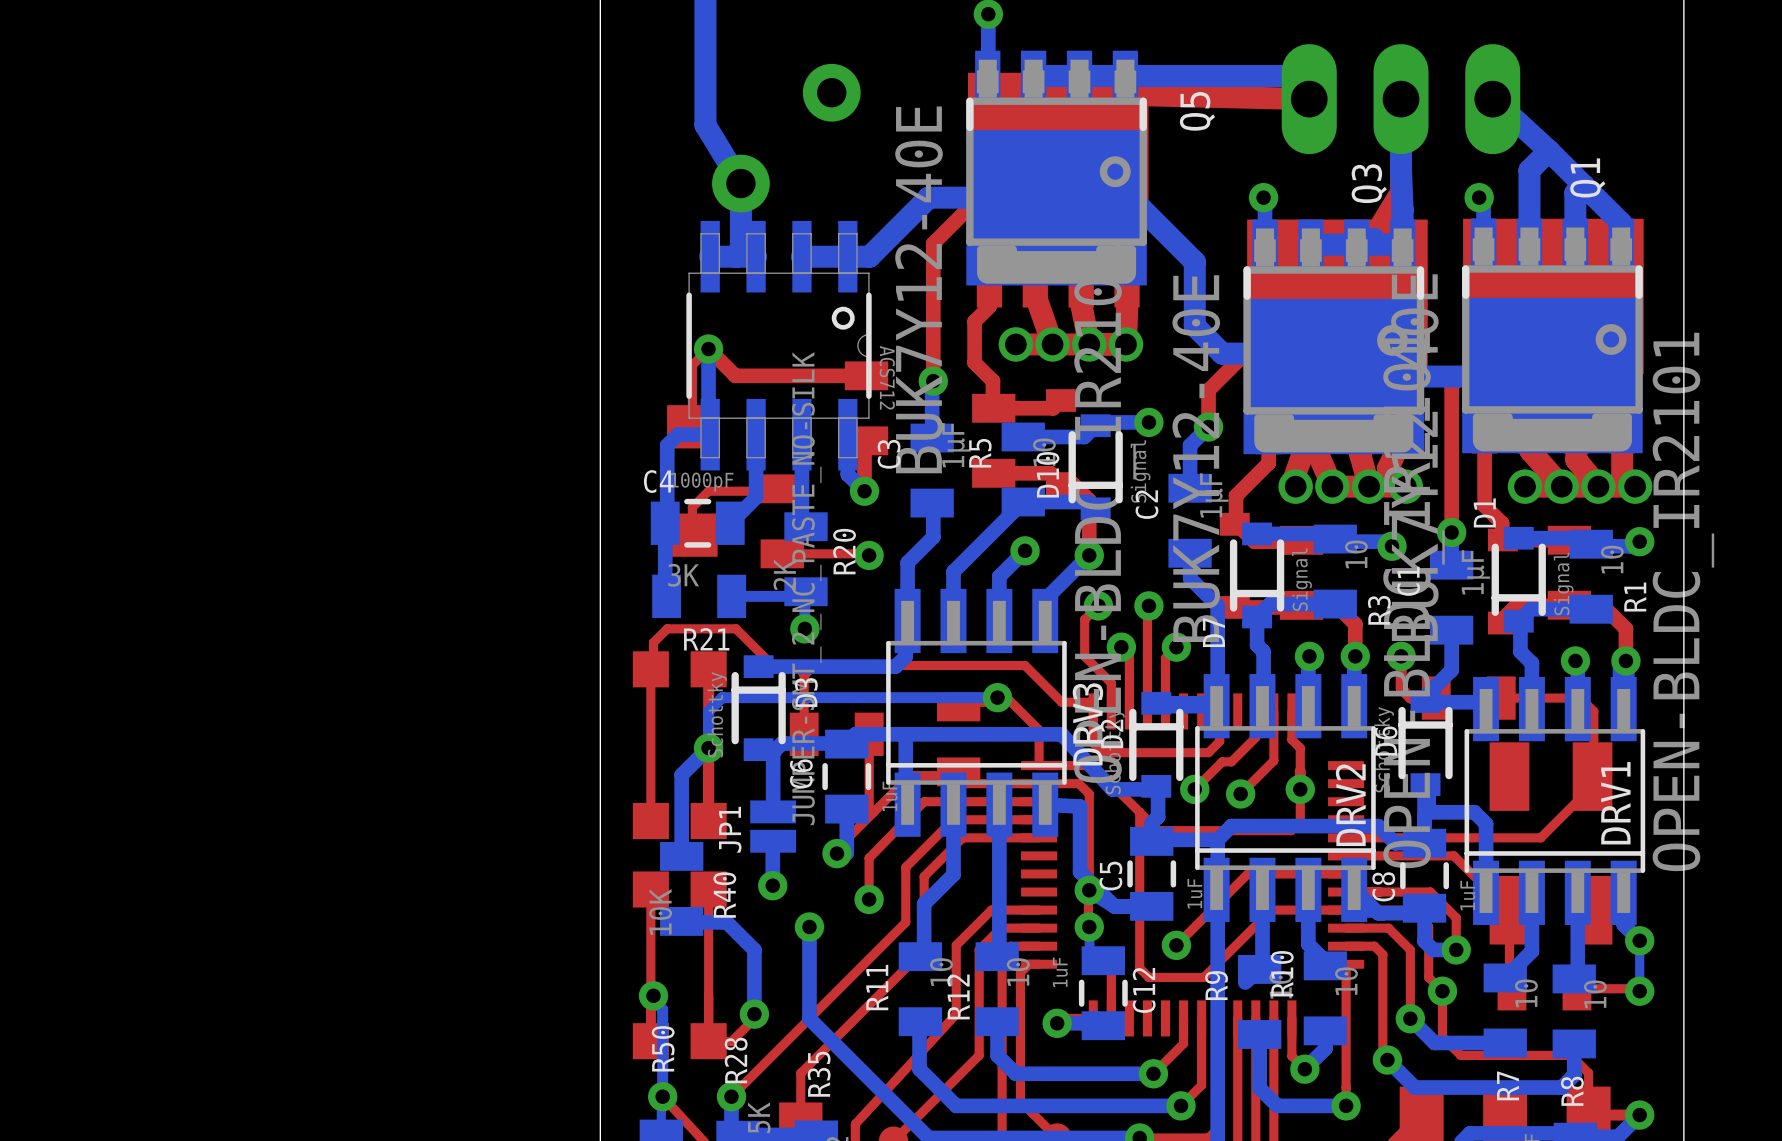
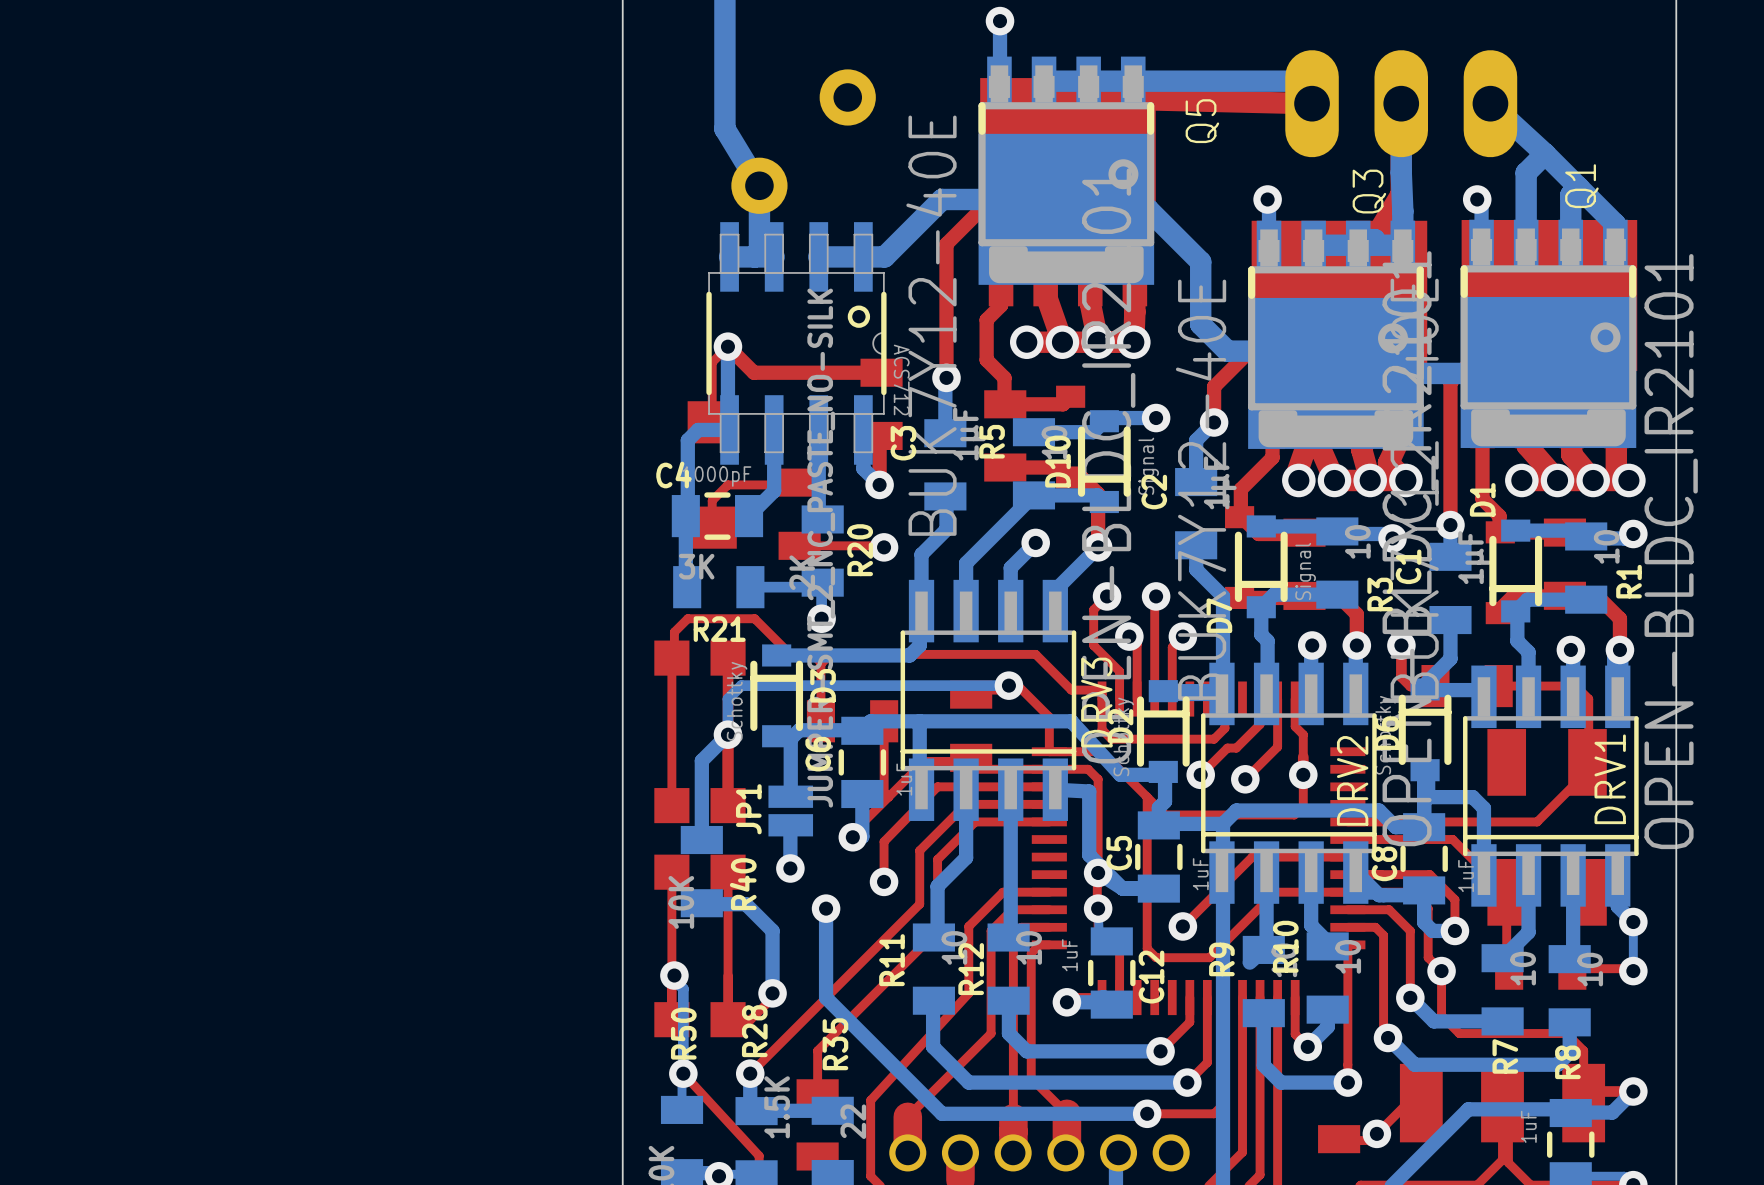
D1 value: Signal (1563, 583) -> none

